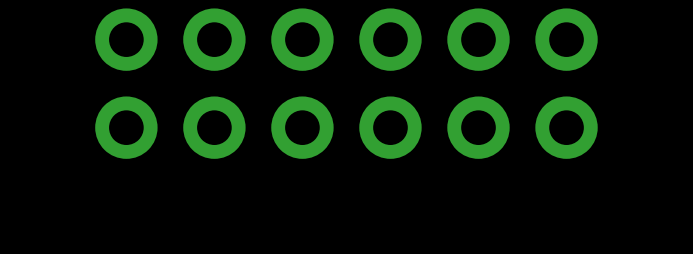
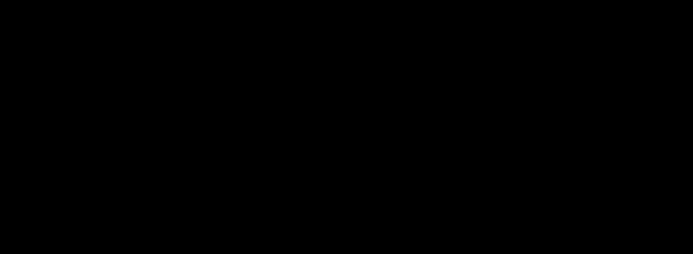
part: (126, 39) -> none
part: (214, 39) -> none
part: (302, 39) -> none
part: (390, 39) -> none
part: (478, 39) -> none
part: (566, 39) -> none
part: (126, 127) -> none
part: (214, 127) -> none
part: (302, 127) -> none
part: (390, 127) -> none
part: (478, 127) -> none
part: (566, 127) -> none

